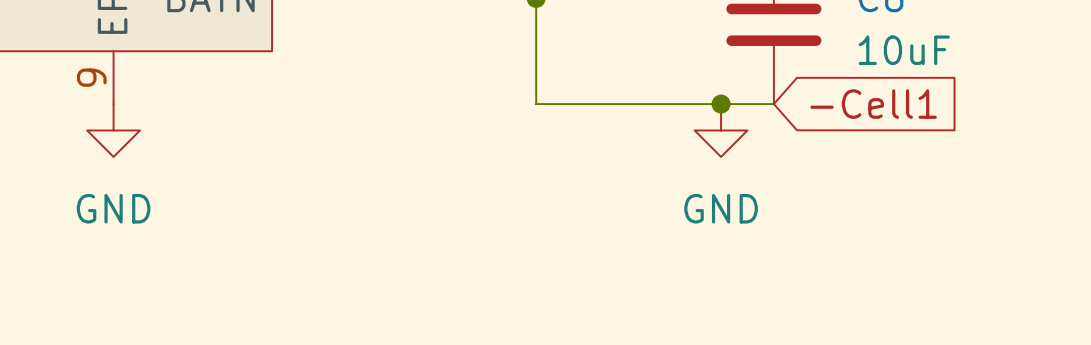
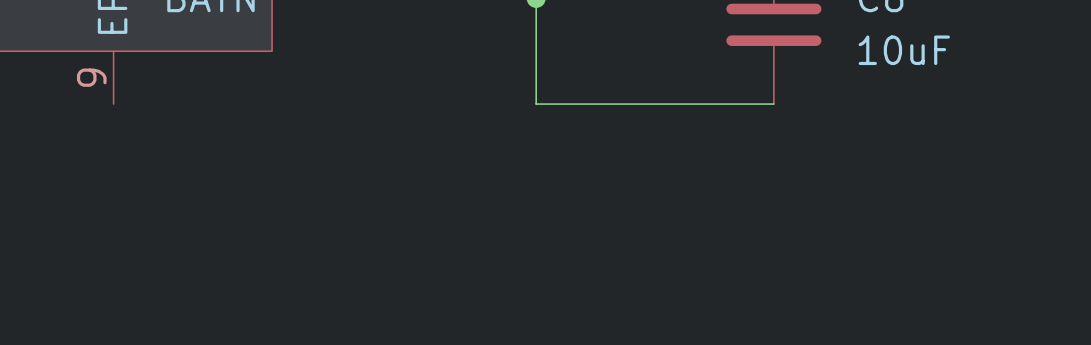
junction: (721, 104) -> none
global label: -Cell1 (873, 104) -> none
power symbol: GND (113, 130) -> none
power symbol: GND (721, 130) -> none

